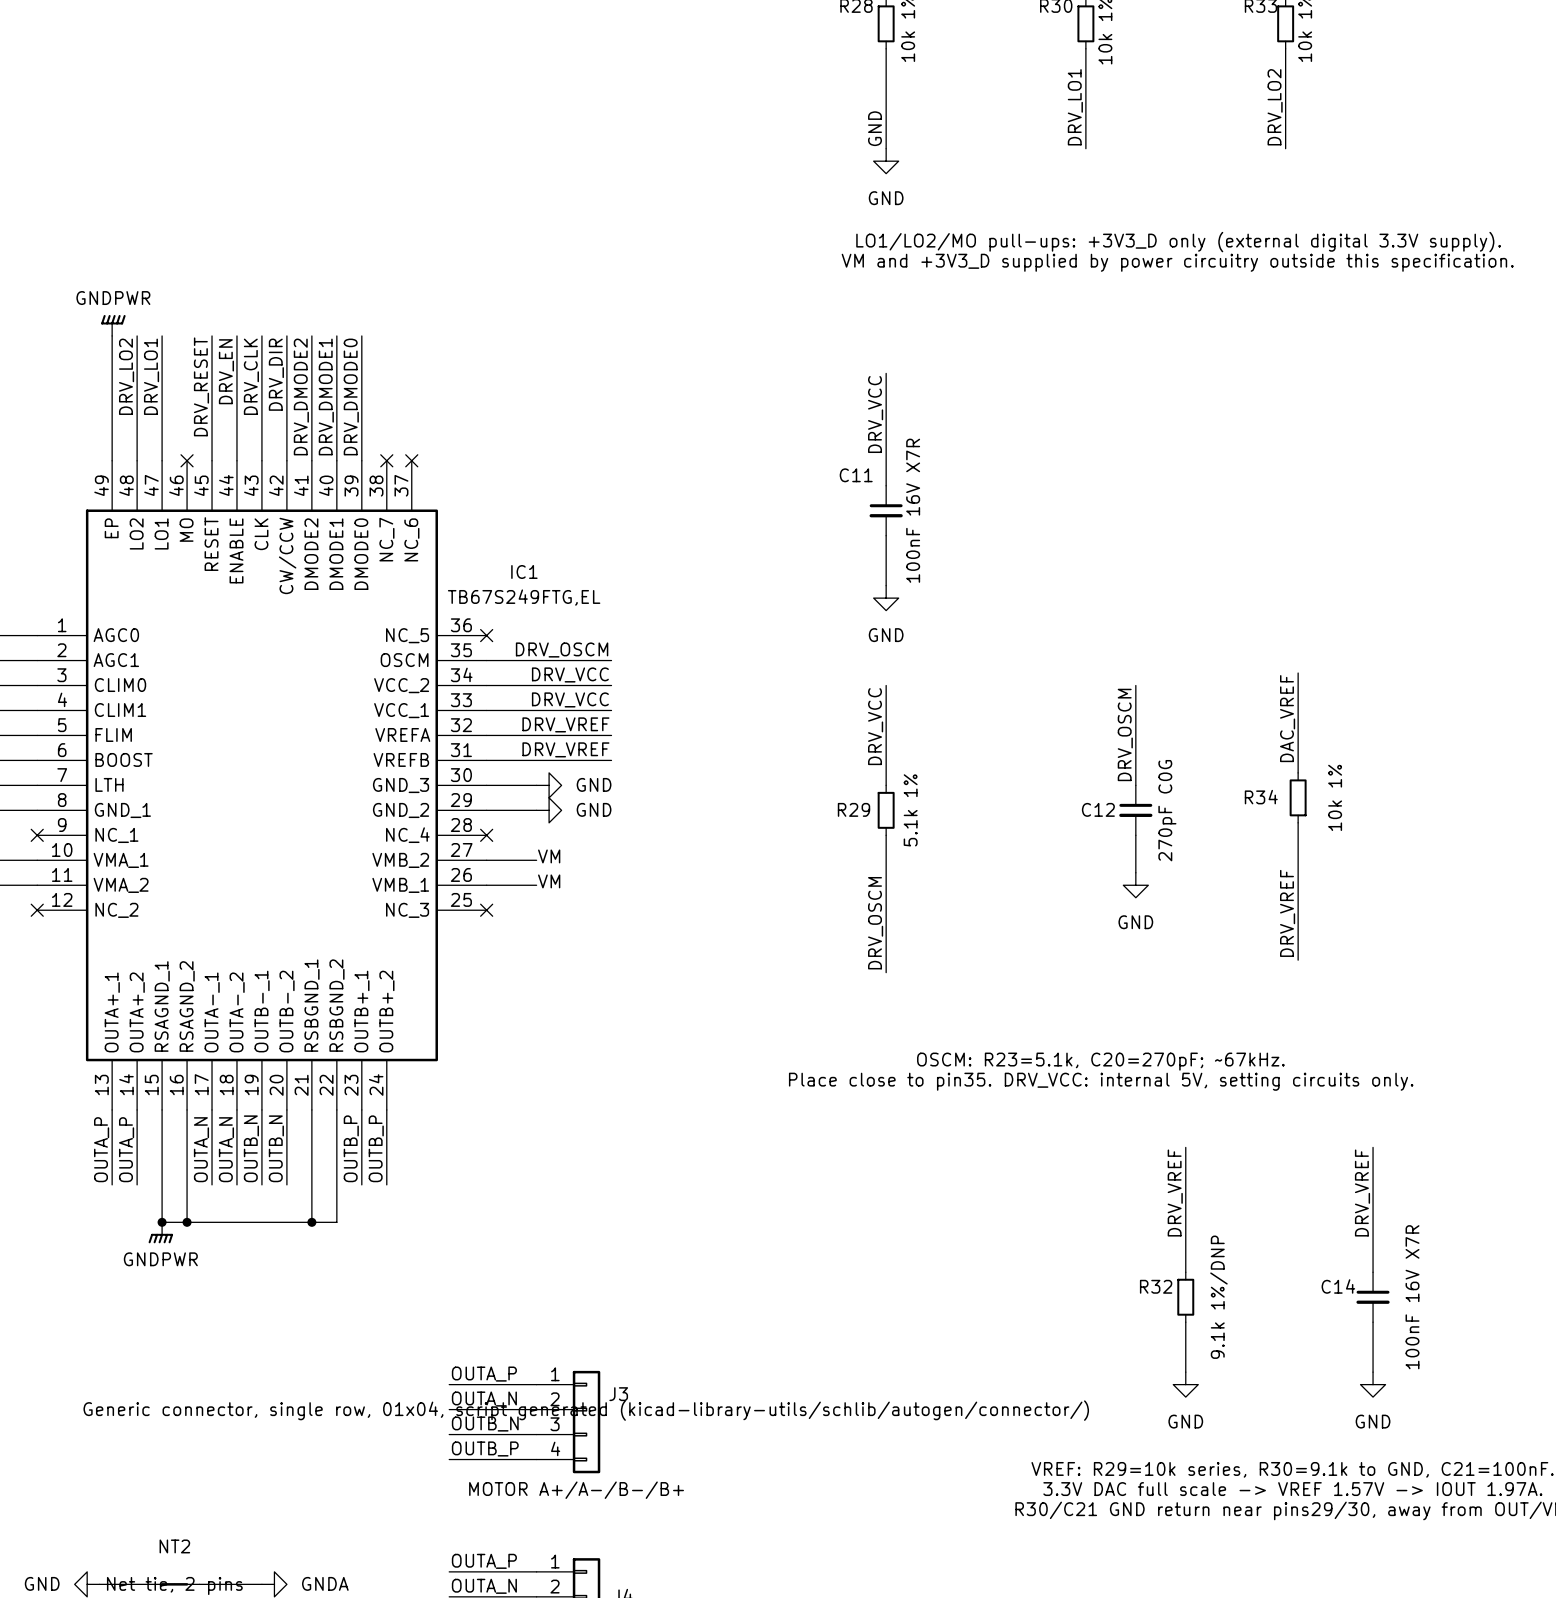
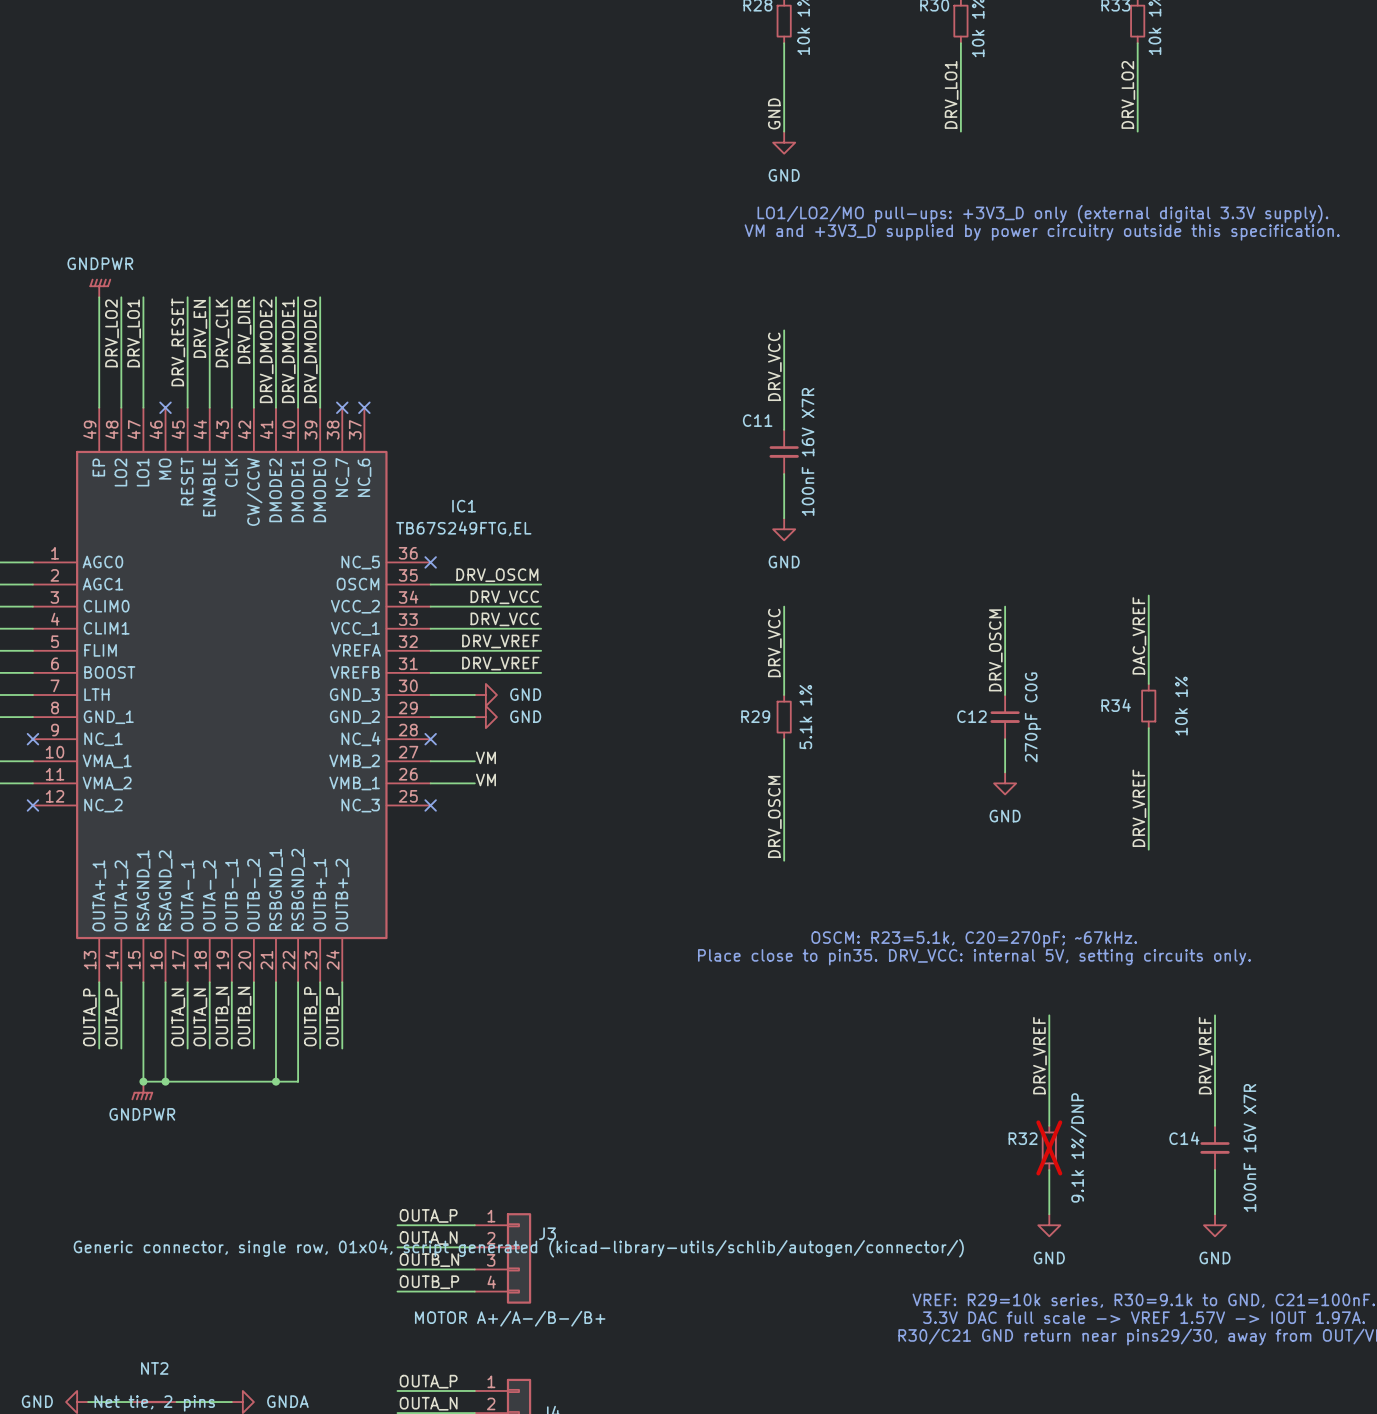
R32 do-not-place cross: none -> (1049, 1147)

